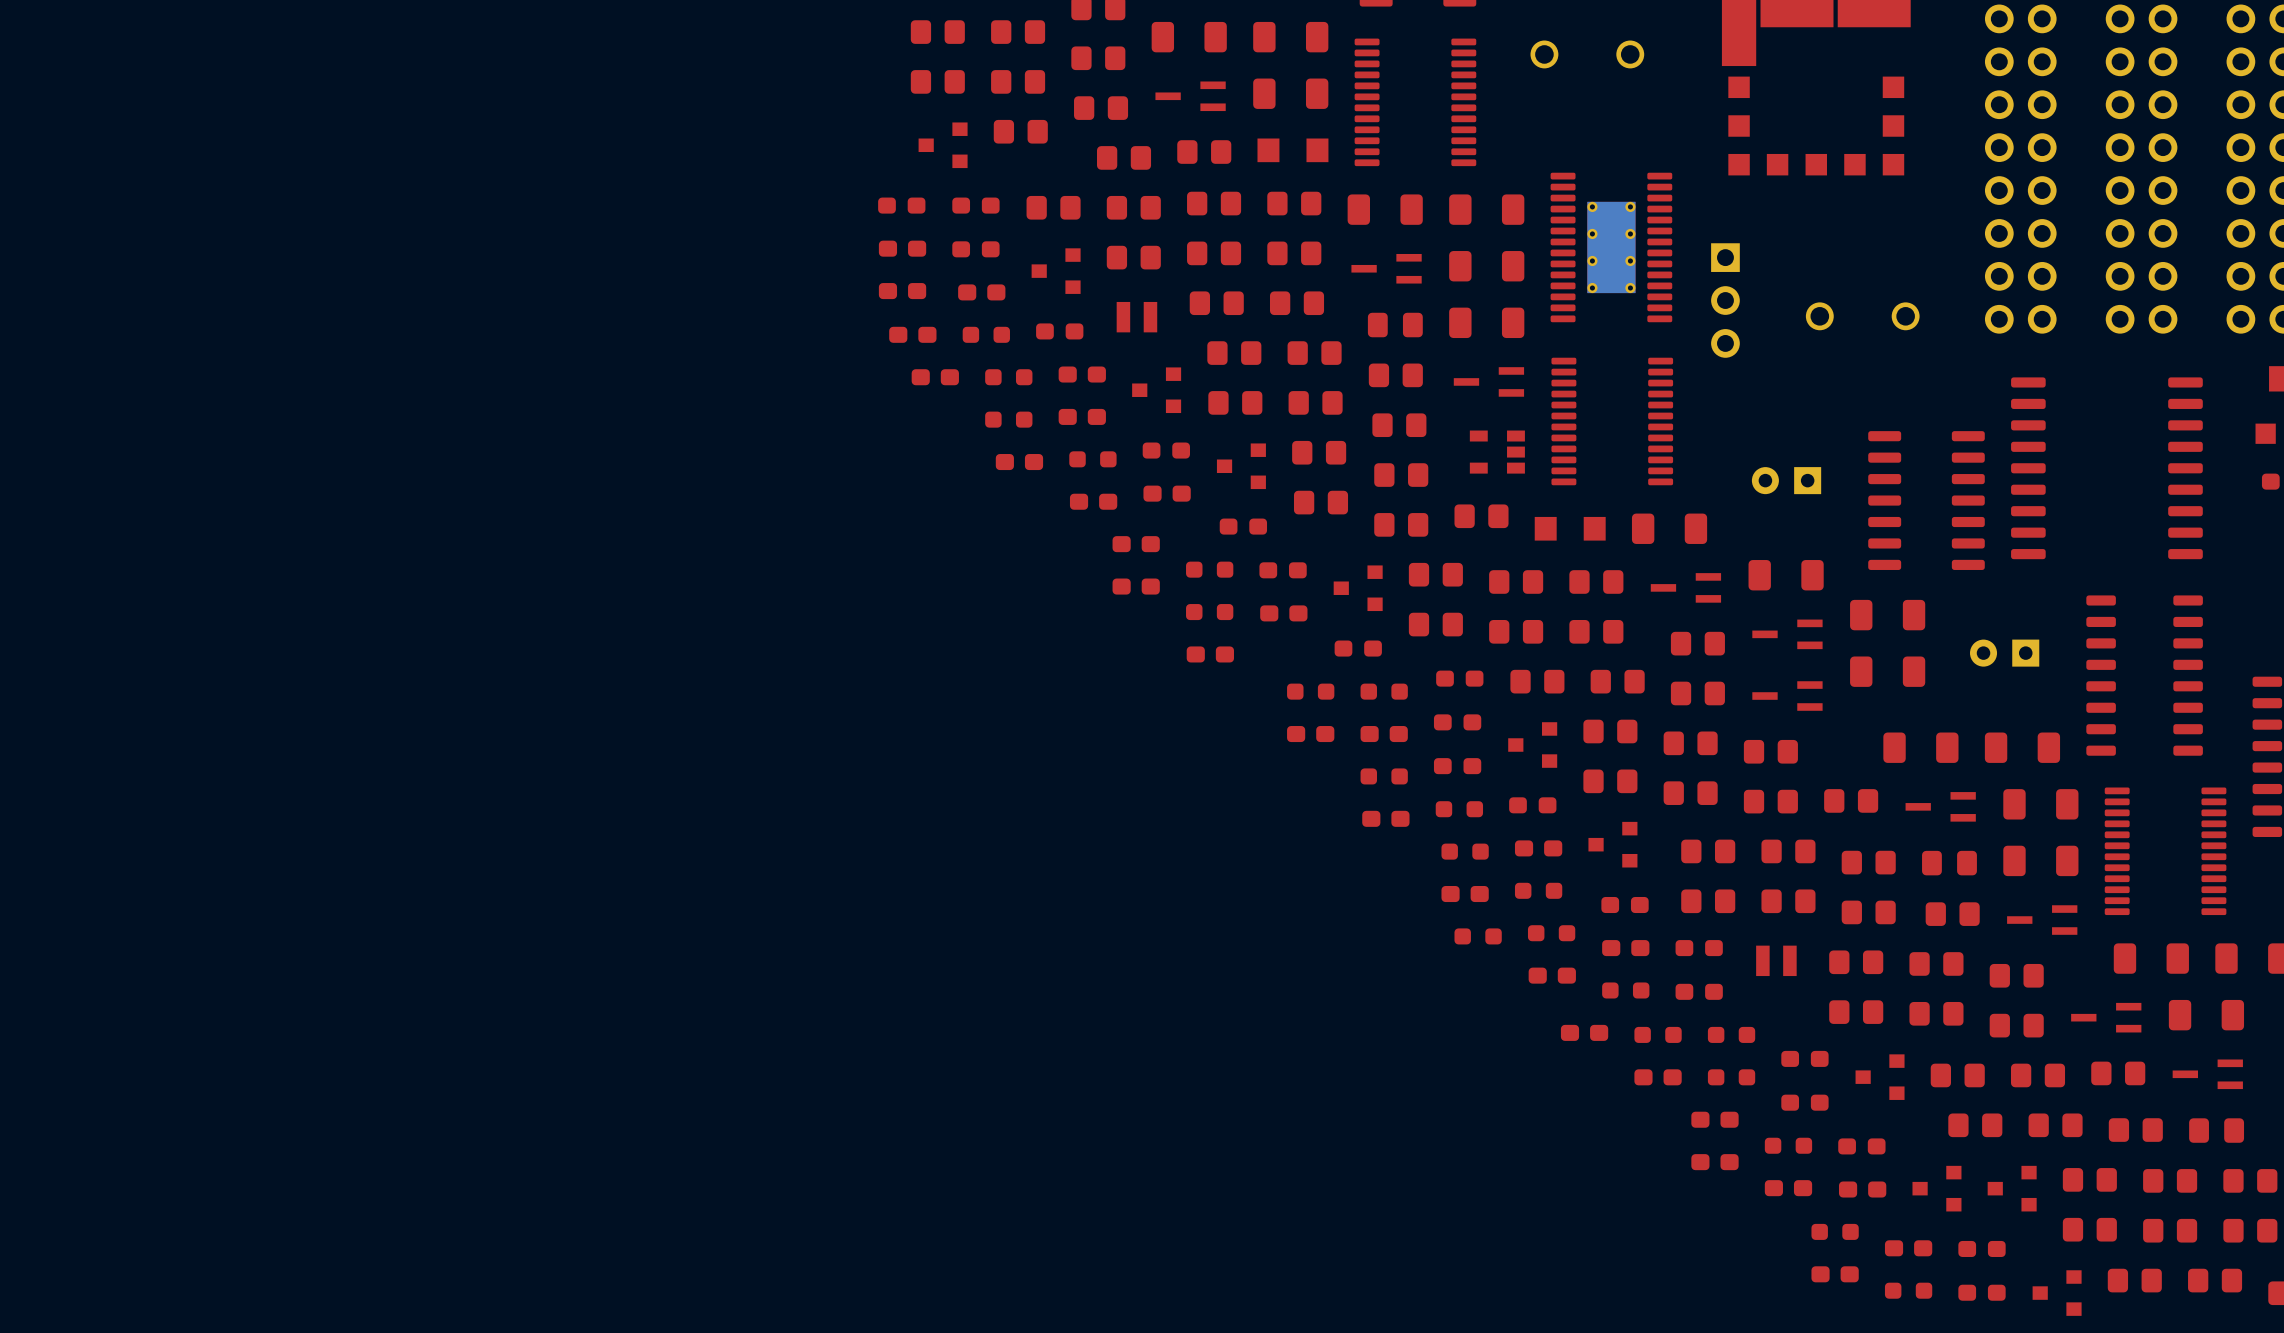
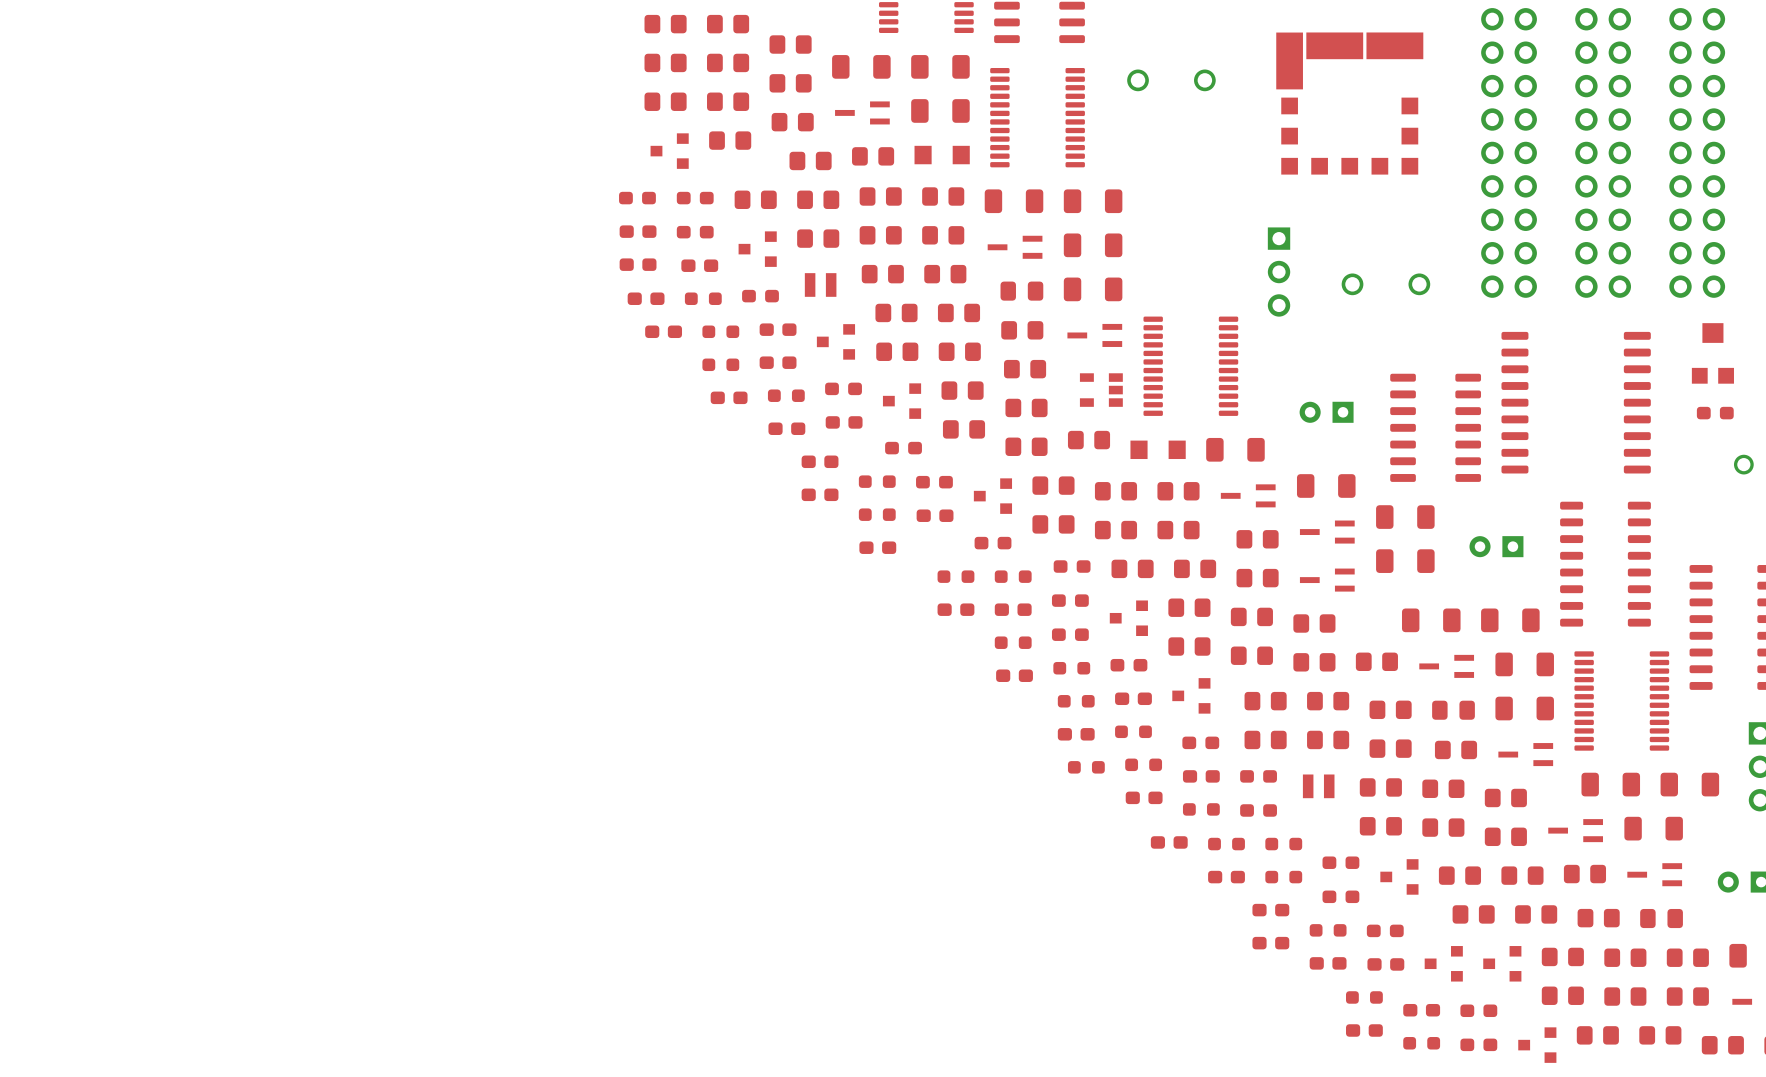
part: (1611, 247) -> none

